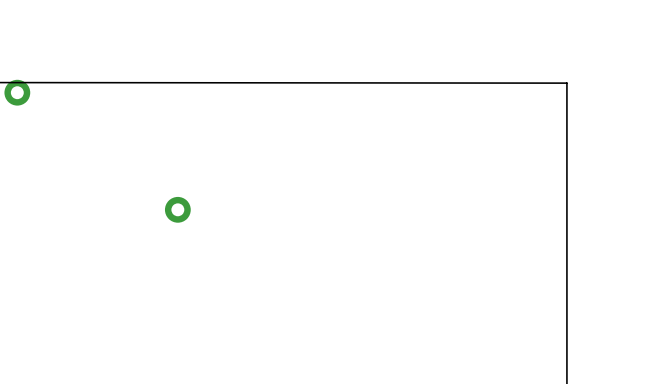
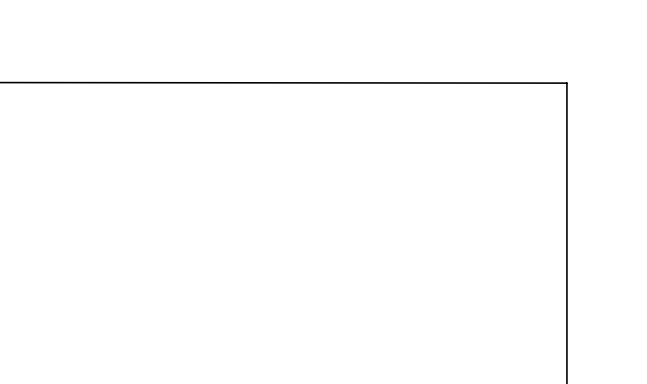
via: (17, 92) -> none
via: (177, 209) -> none

